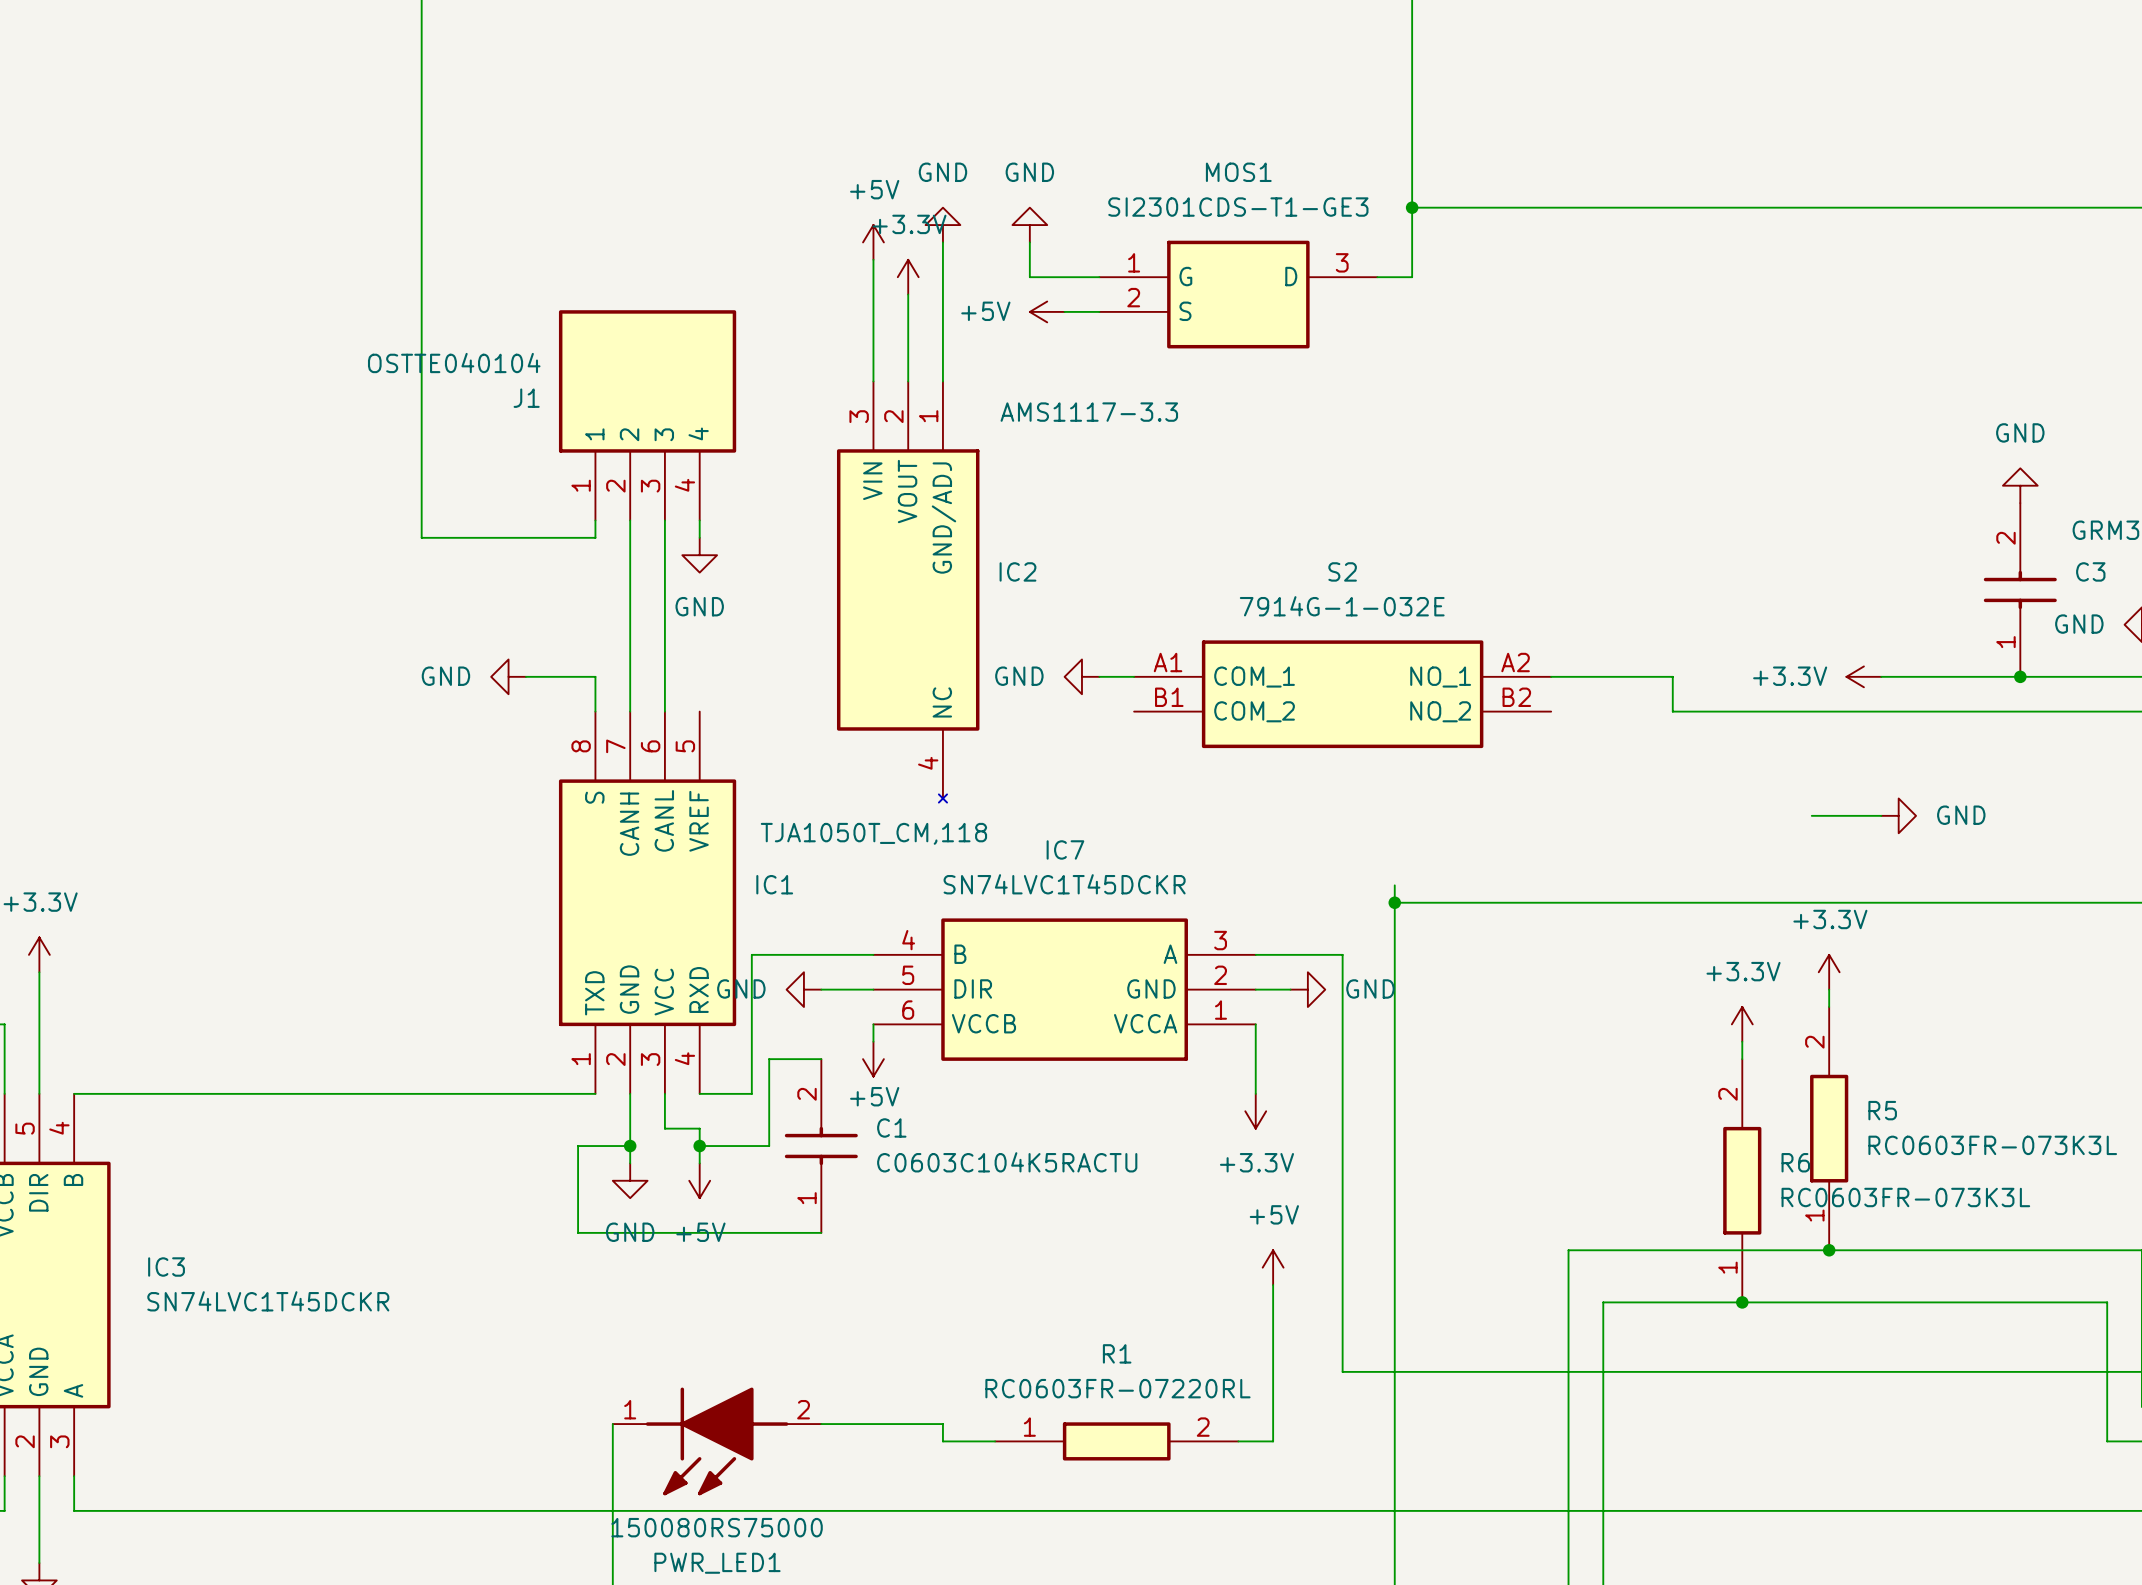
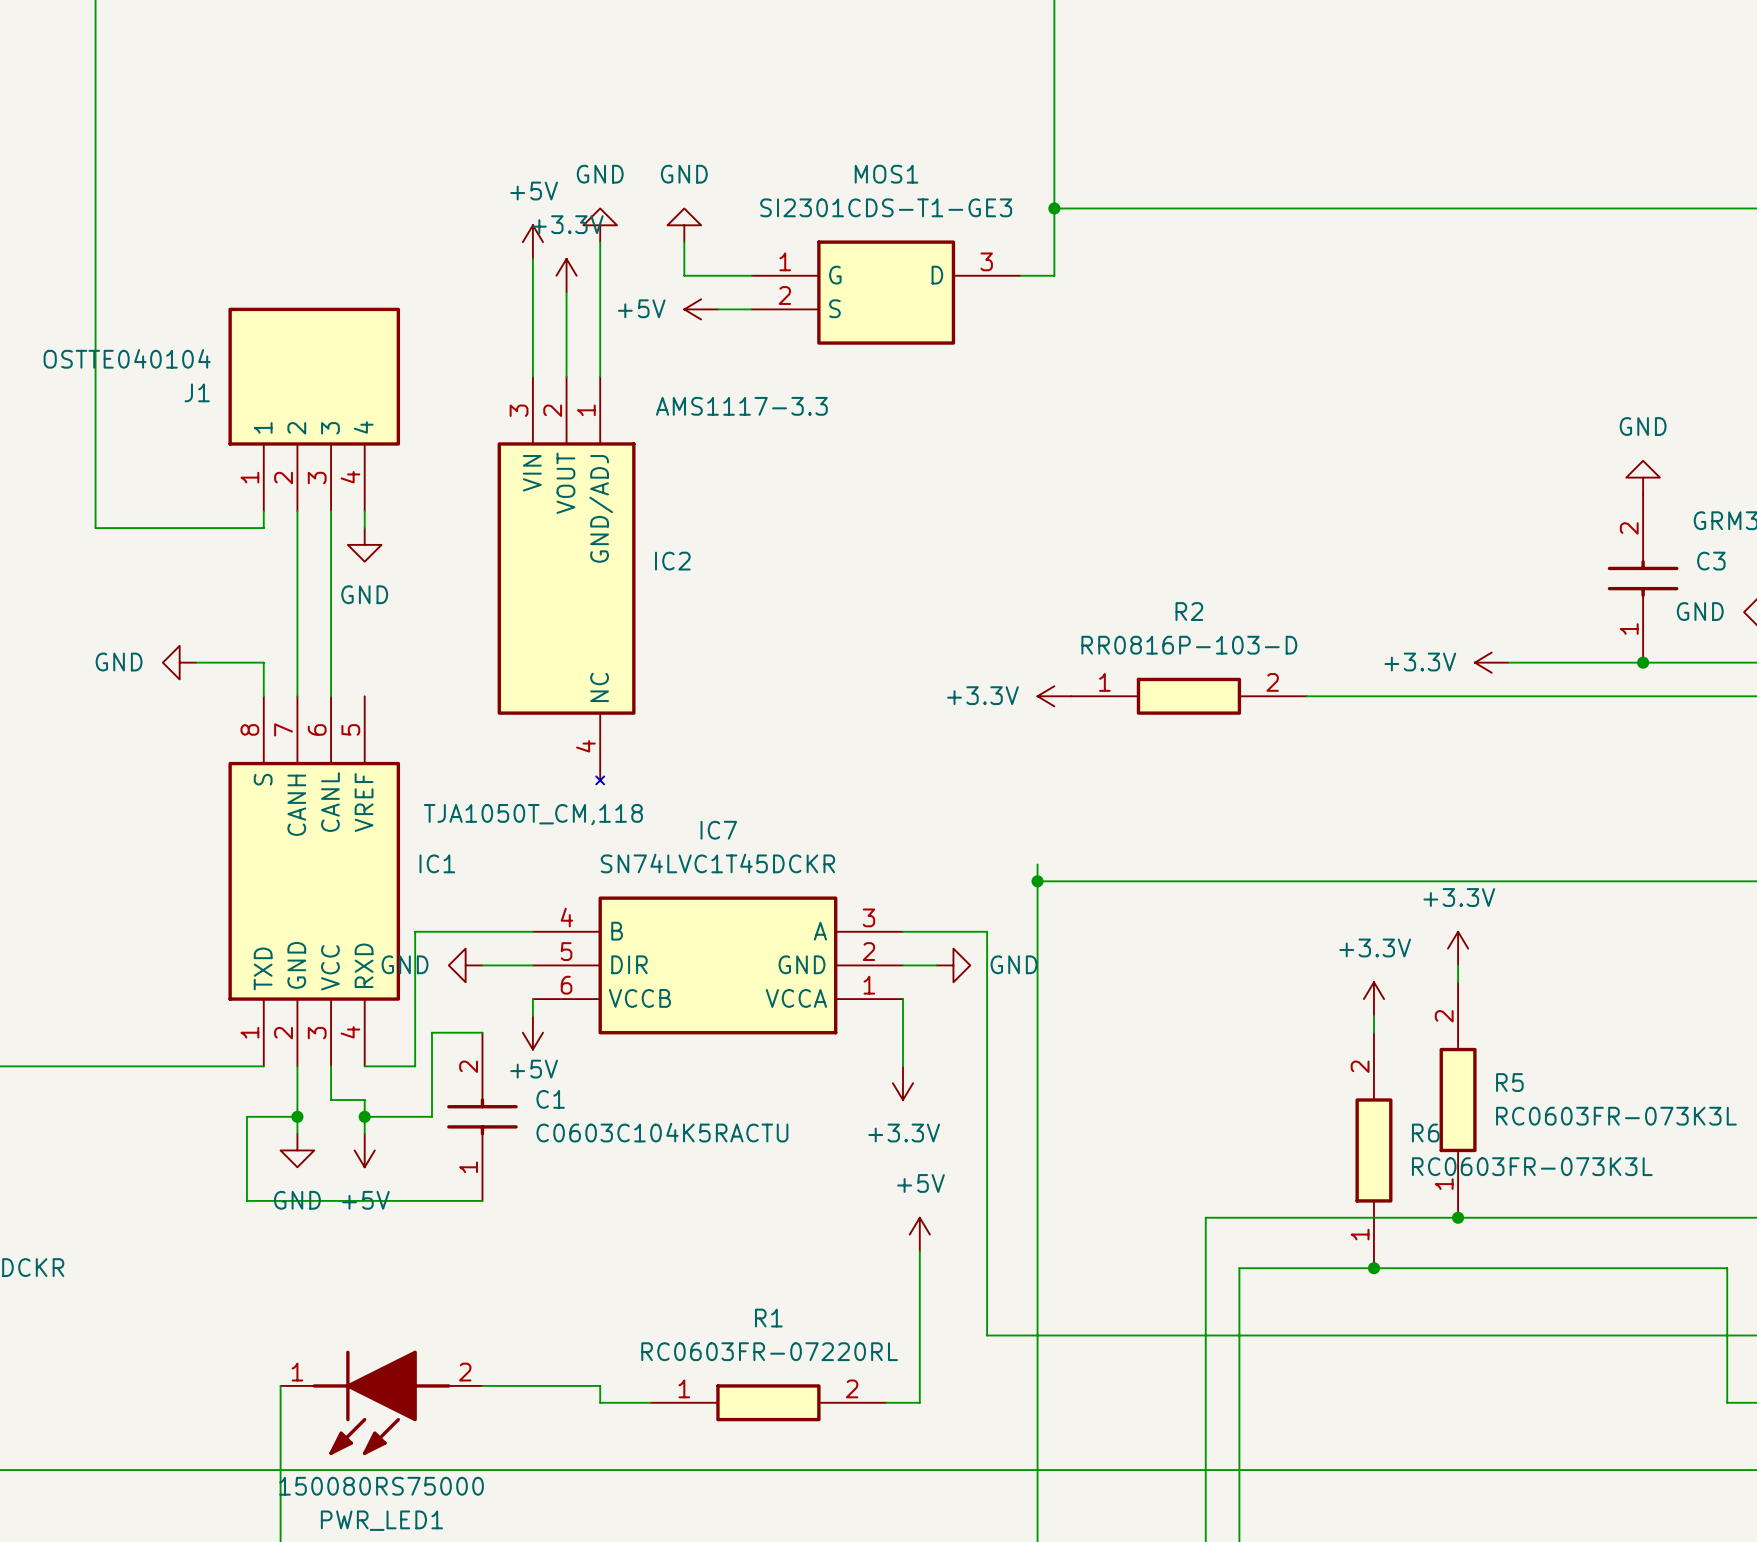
power symbol: GND (1081, 676) -> none
wire: (1099, 676) (1134, 676) -> none
wire: (1551, 676) (1672, 676) (1672, 711) -> none
S2: 7914G-1-032E (1342, 694) -> none
power symbol: none -> +3.3V (1054, 696)
R2: none -> RR0816P-103-D (1188, 696)
wire: (1811, 815) (1881, 815) -> none
power symbol: GND (1898, 815) -> none

